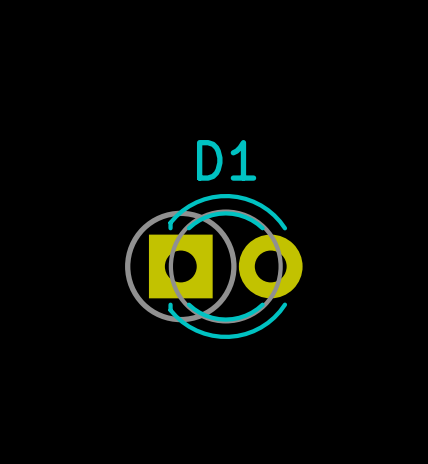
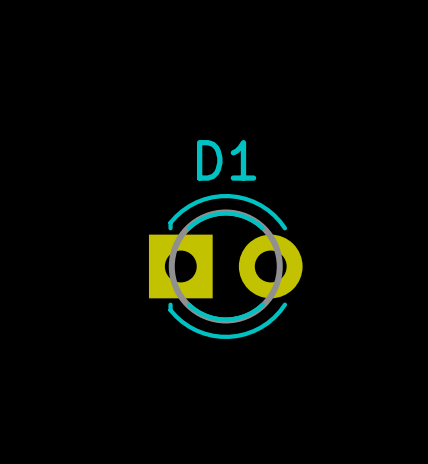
D1 footprint: [125, 193, 303, 339] -> [148, 193, 303, 339]

